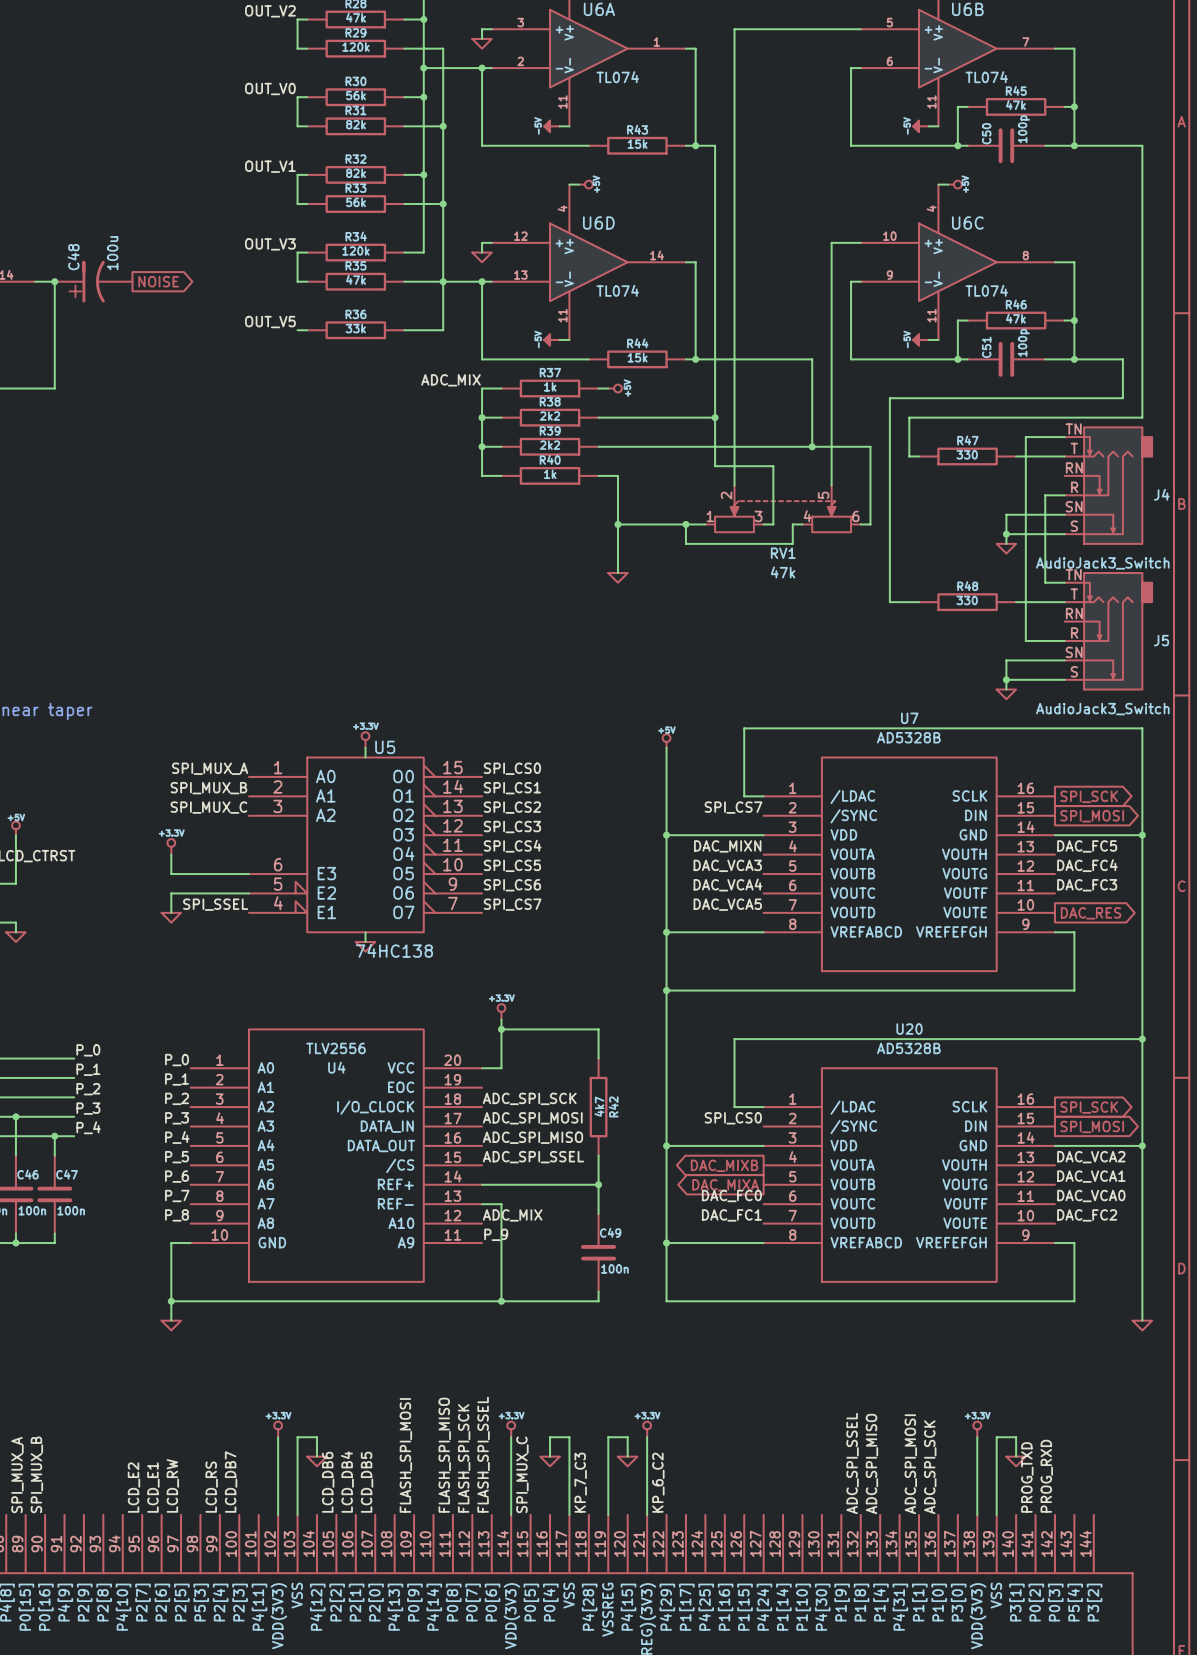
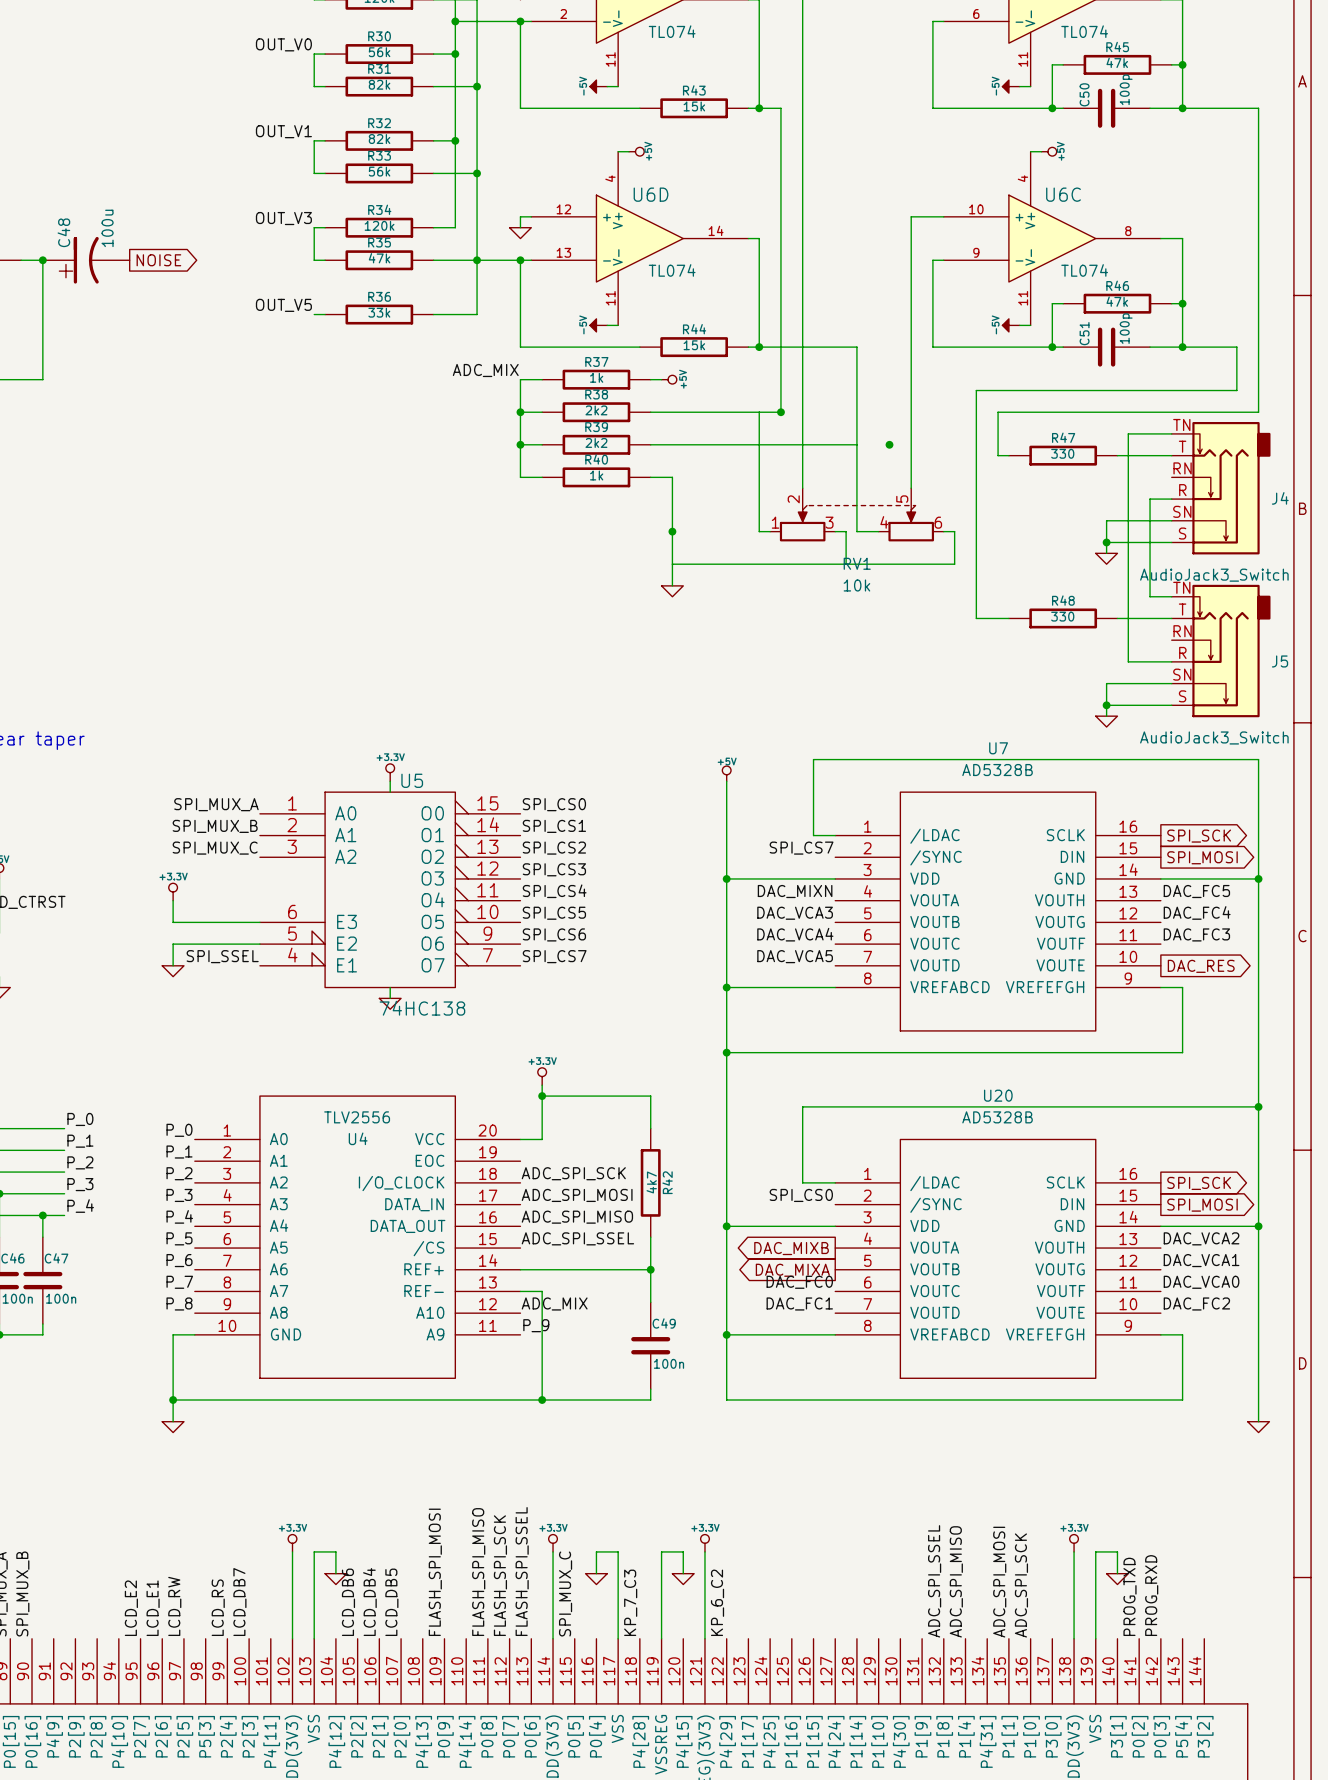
wire: (783, 359) (812, 359) (812, 446) -> (856, 347) (856, 531) (867, 531)
wire: (715, 417) (715, 466) (773, 466) (773, 524) -> (846, 564) (846, 531)
wire: (783, 446) (870, 446) (870, 524) -> (672, 564) (954, 564) (954, 531)
wire: (617, 524) (695, 524) -> (759, 412) (759, 531)
wire: (685, 524) (685, 543) (792, 543) (792, 524) -> none
junction: (685, 524) -> none
RV1 value: 47k (783, 572) -> 10k (856, 585)

